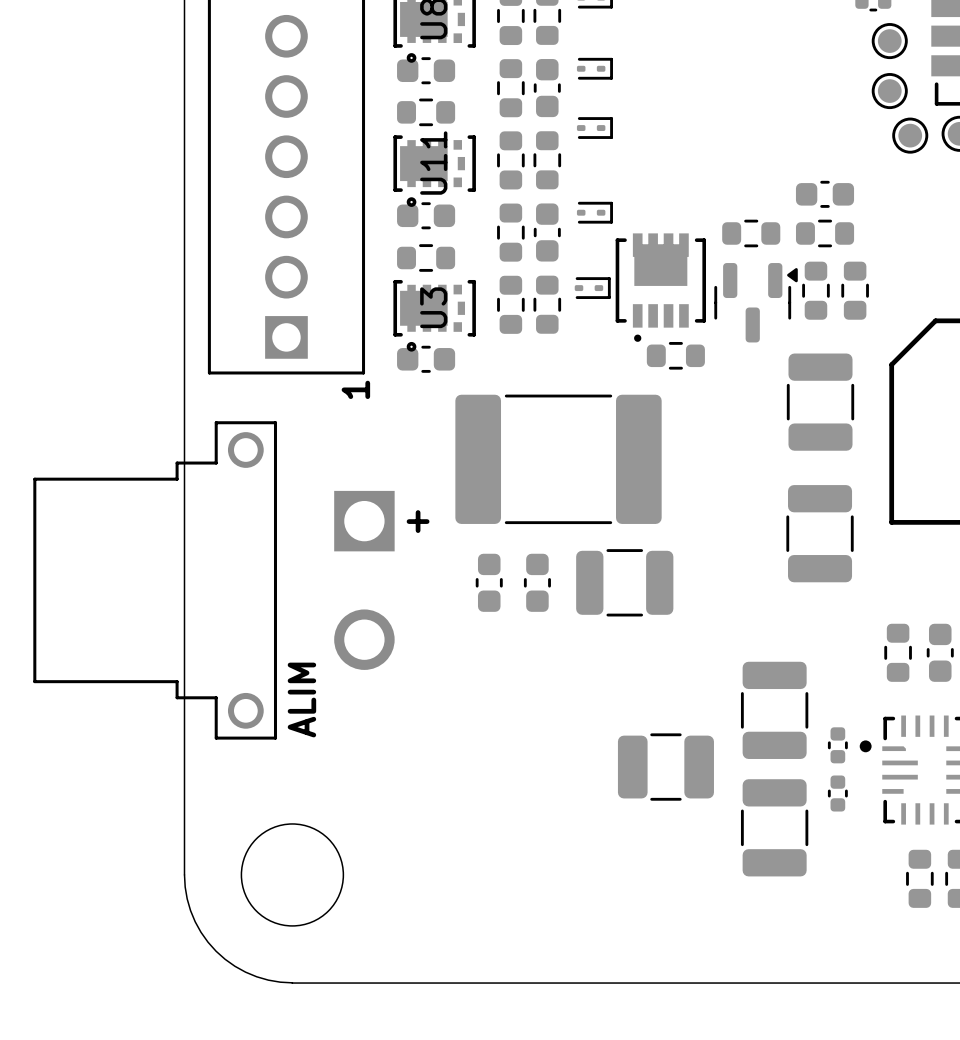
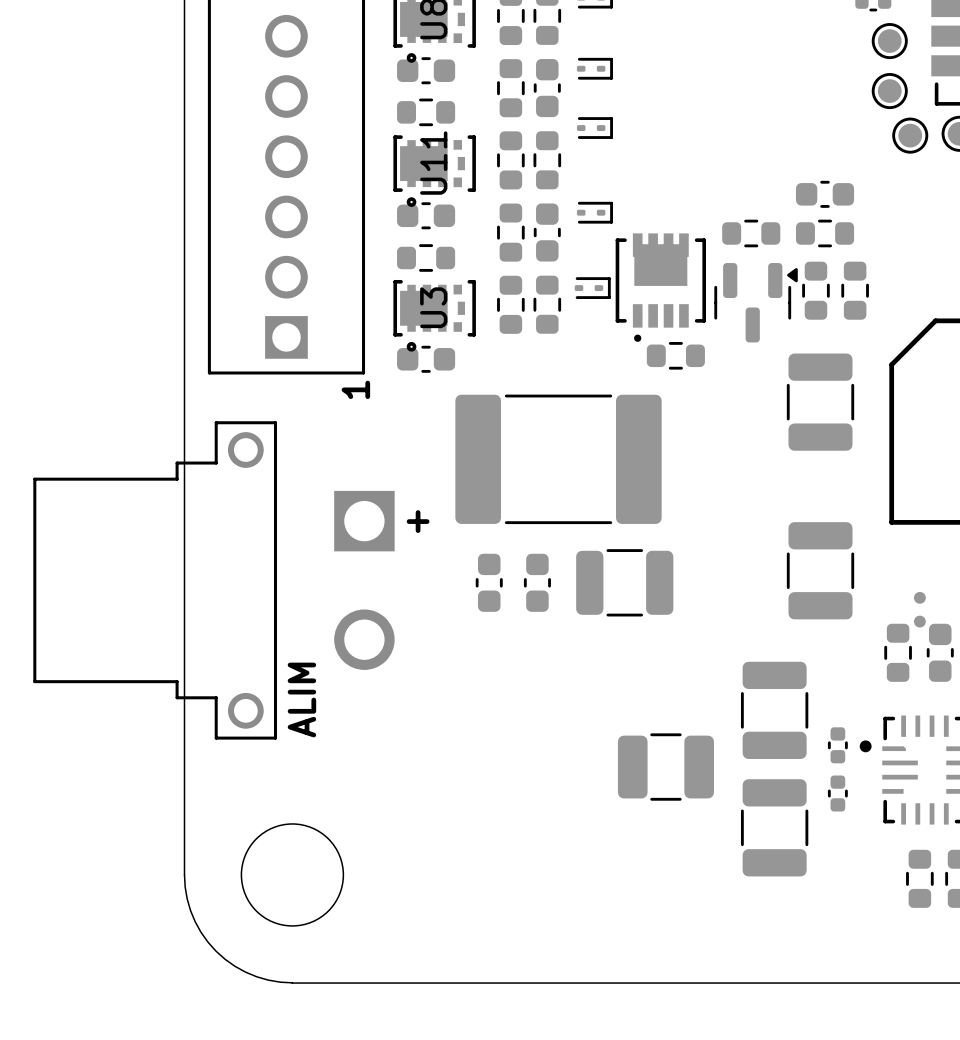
part position: (820, 533) -> (820, 570)
part: none -> (919, 609)

